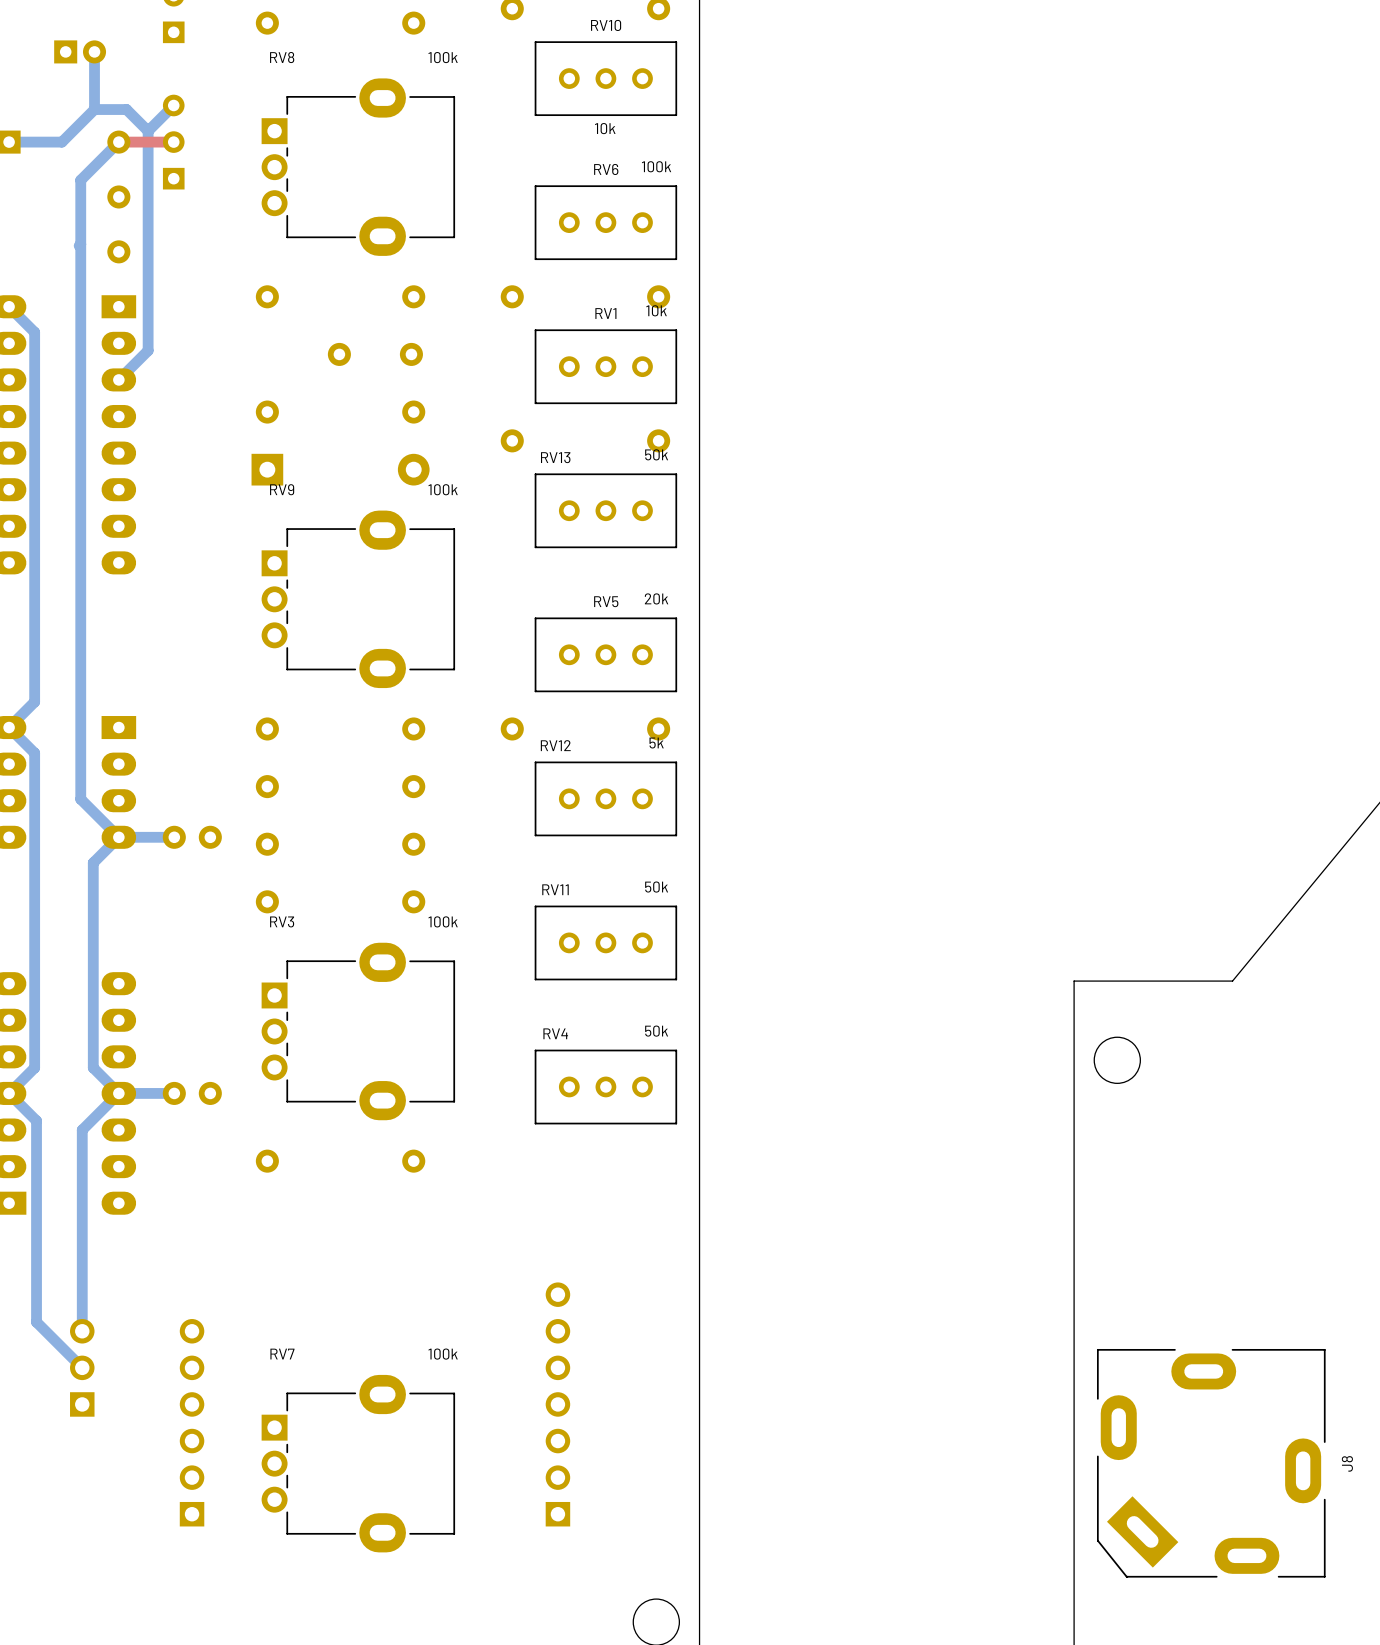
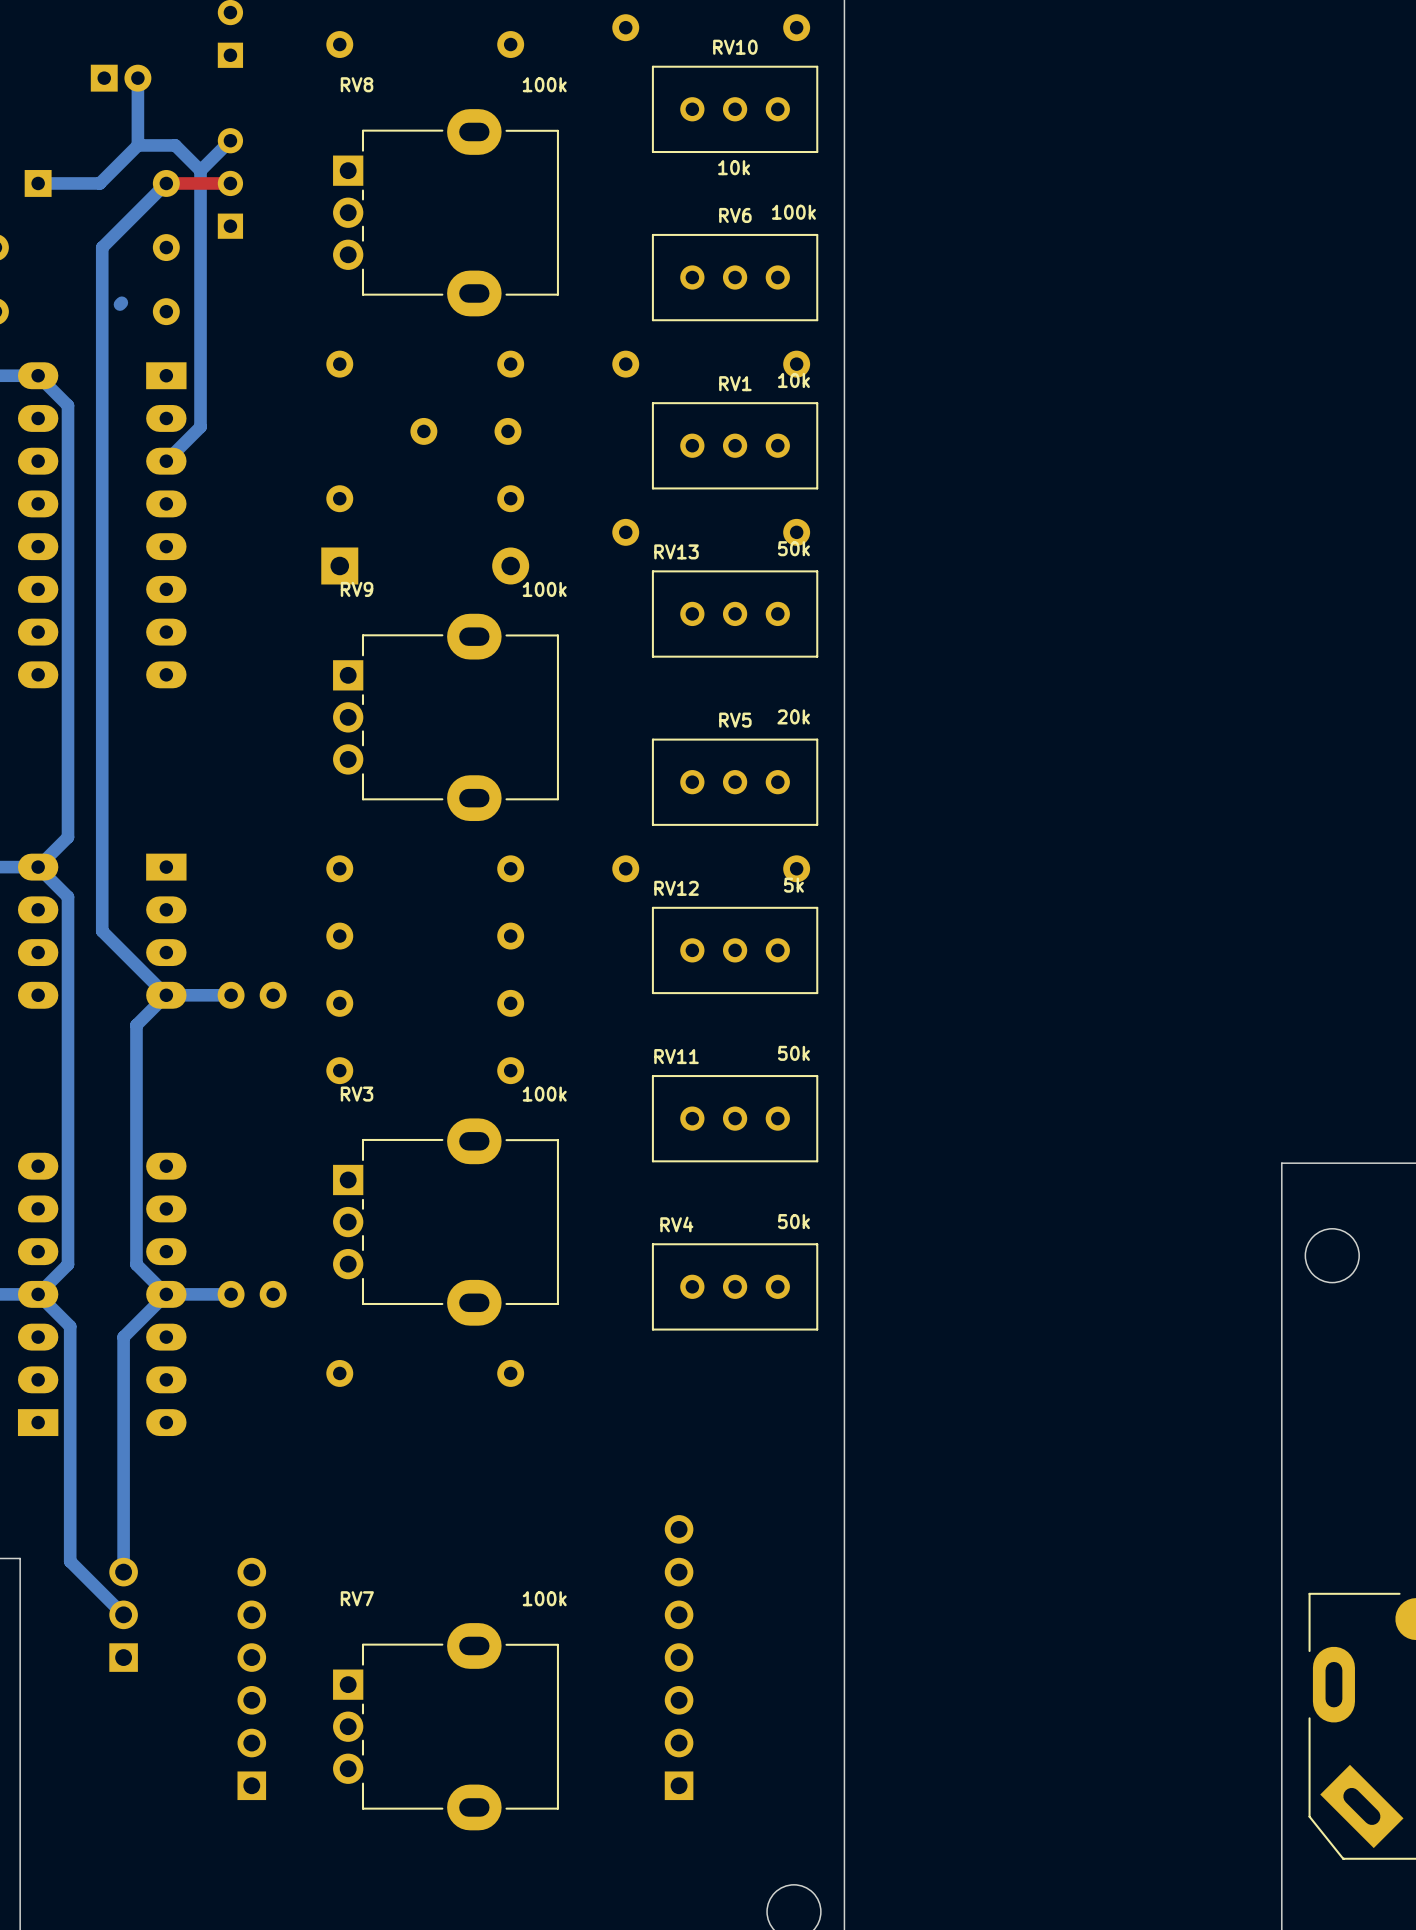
bottom track: (80, 180) (80, 799) -> (121, 227) (102, 247) (102, 931) (121, 950)

